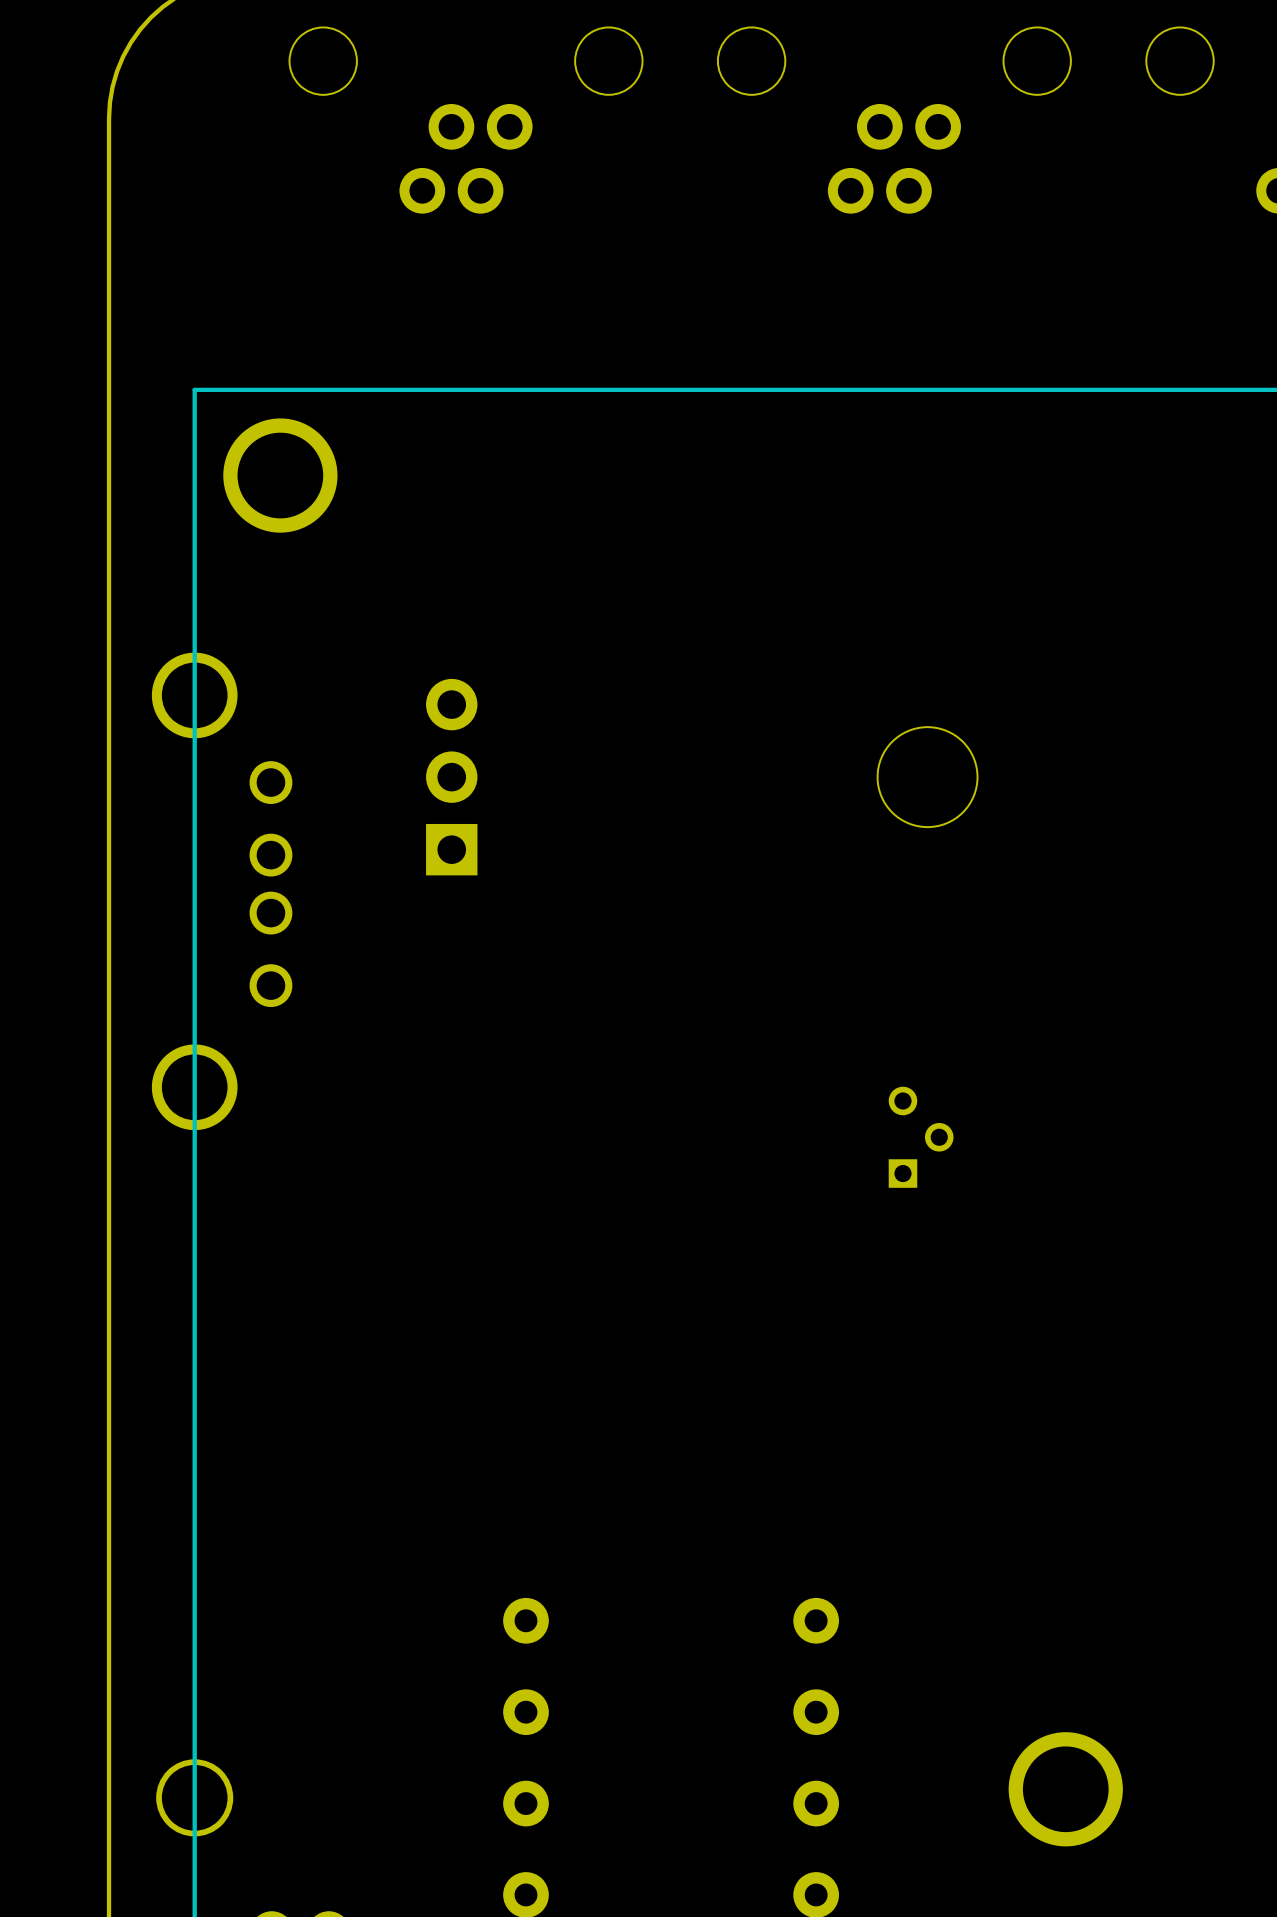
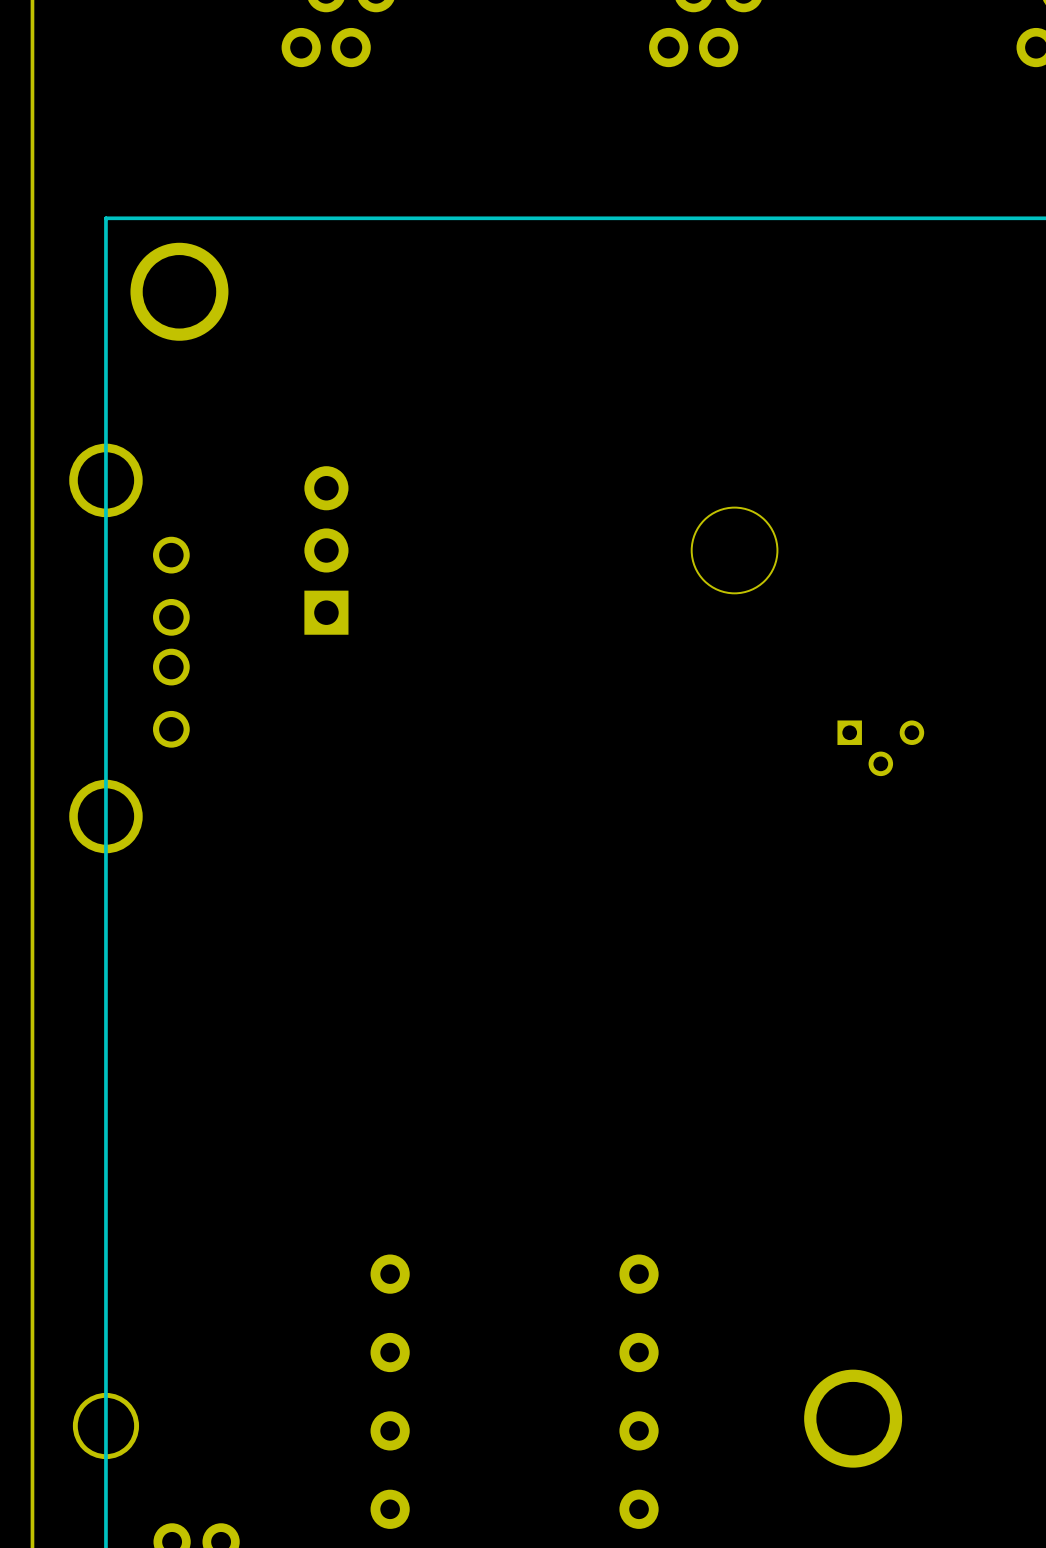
part rotation: 0° (921, 1137) -> 90° clockwise (880, 748)
part position: (921, 1137) -> (880, 748)

